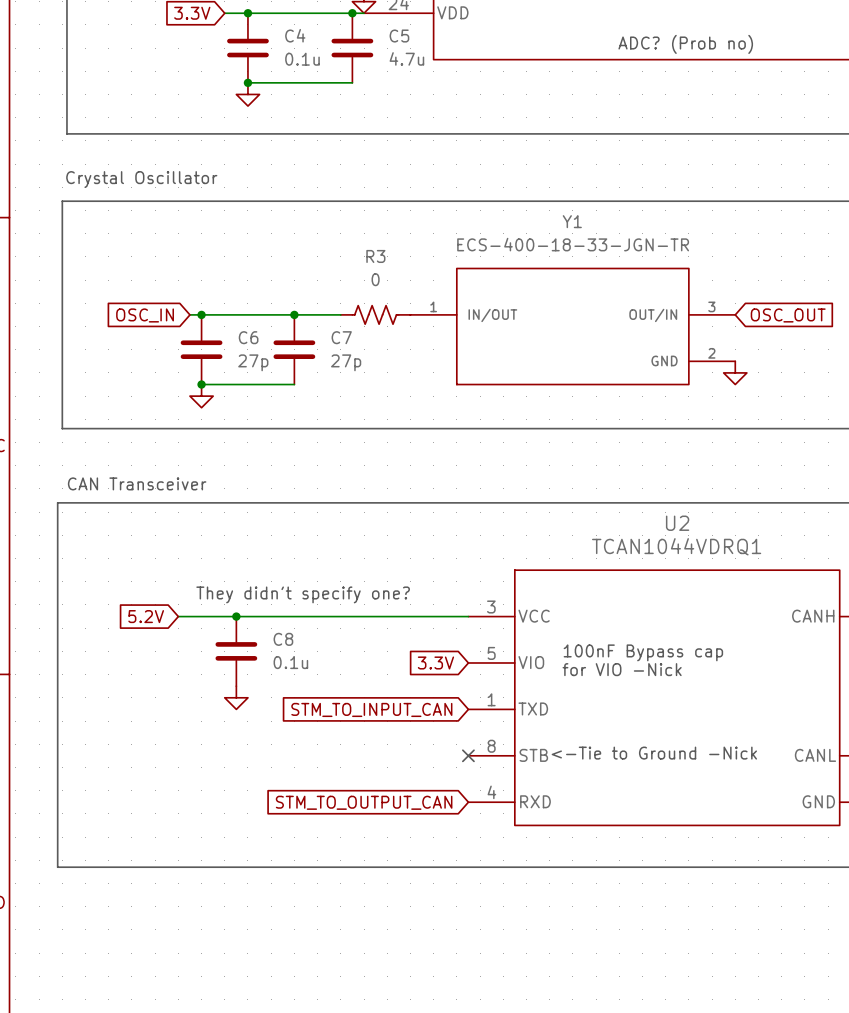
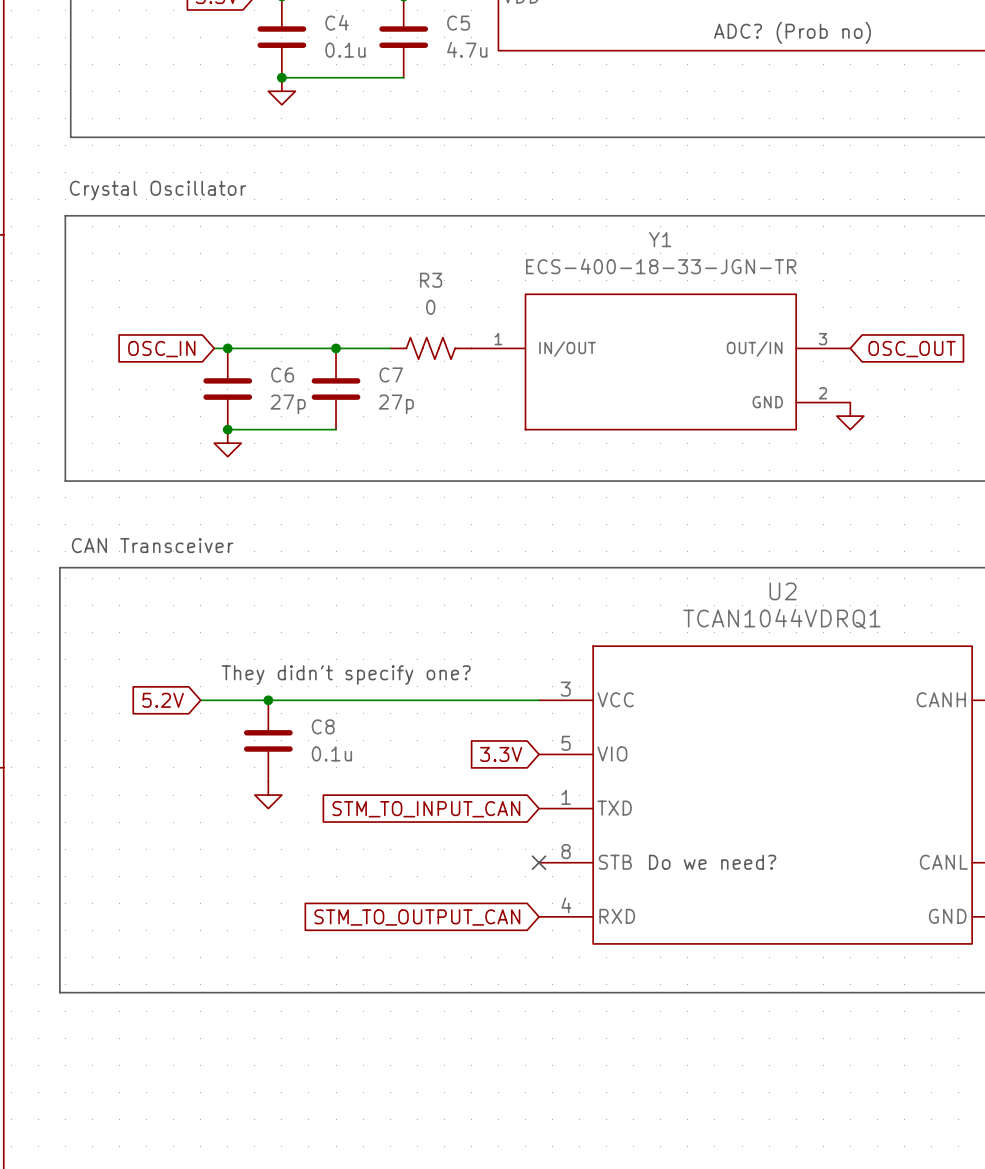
text: 100nF Bypass cap (643, 652) -> none
text: for VIO -Nick (622, 669) -> none
text: <-Tie to Ground -Nick (654, 753) -> none
text: none -> Do we need? (712, 862)

